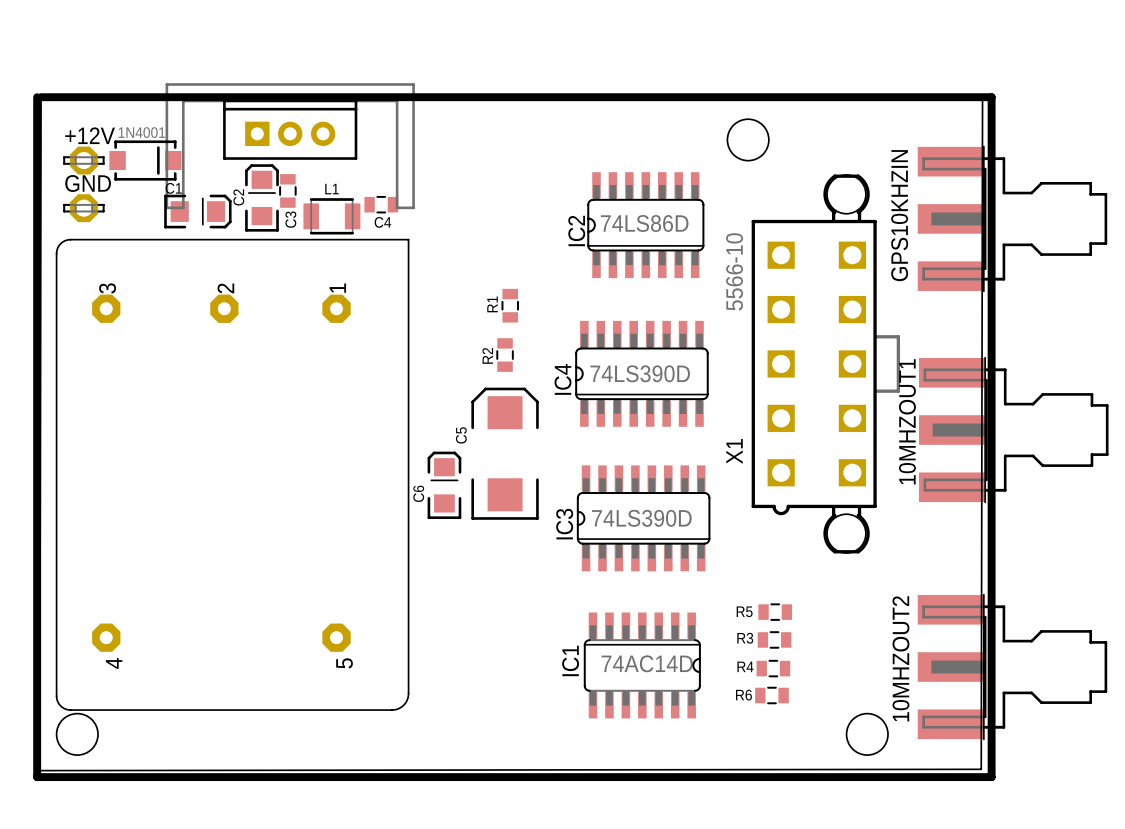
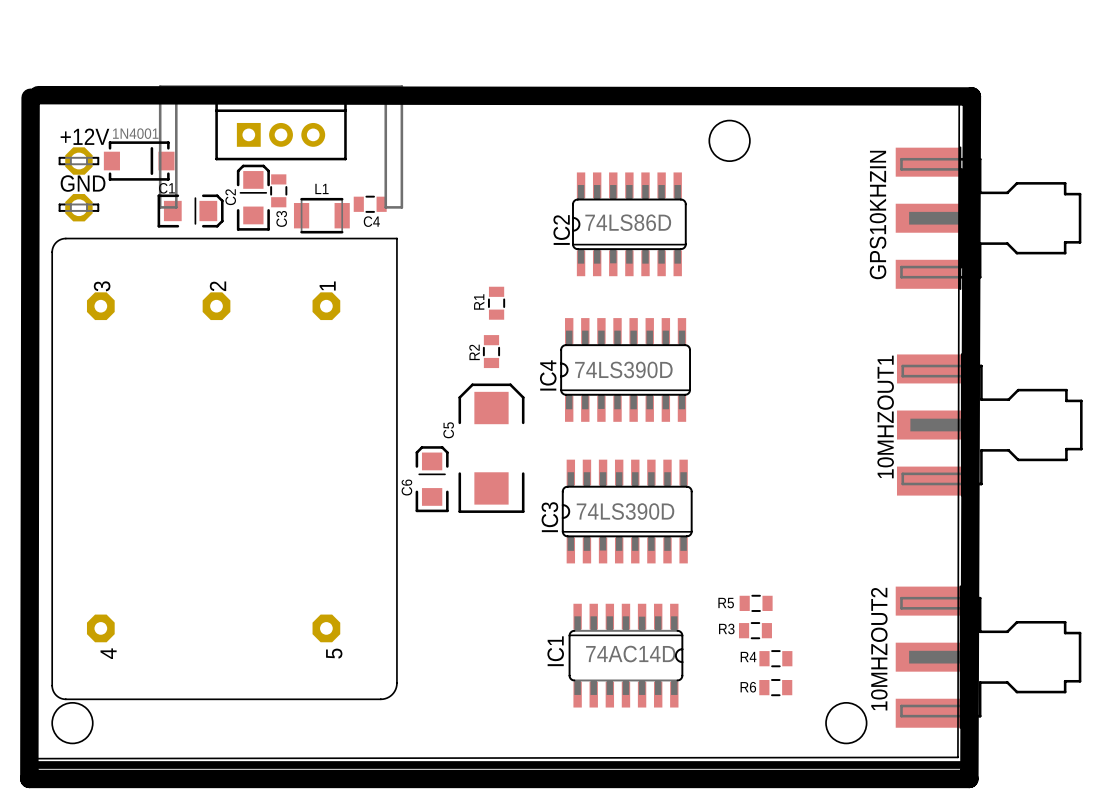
board edge: none -> (38, 95) (971, 96) (969, 778) (29, 778) (30, 97)
X1: 5566-10 (825, 363) -> none
R4 position: (773, 668) -> (775, 658)
R6 position: (771, 695) -> (775, 687)

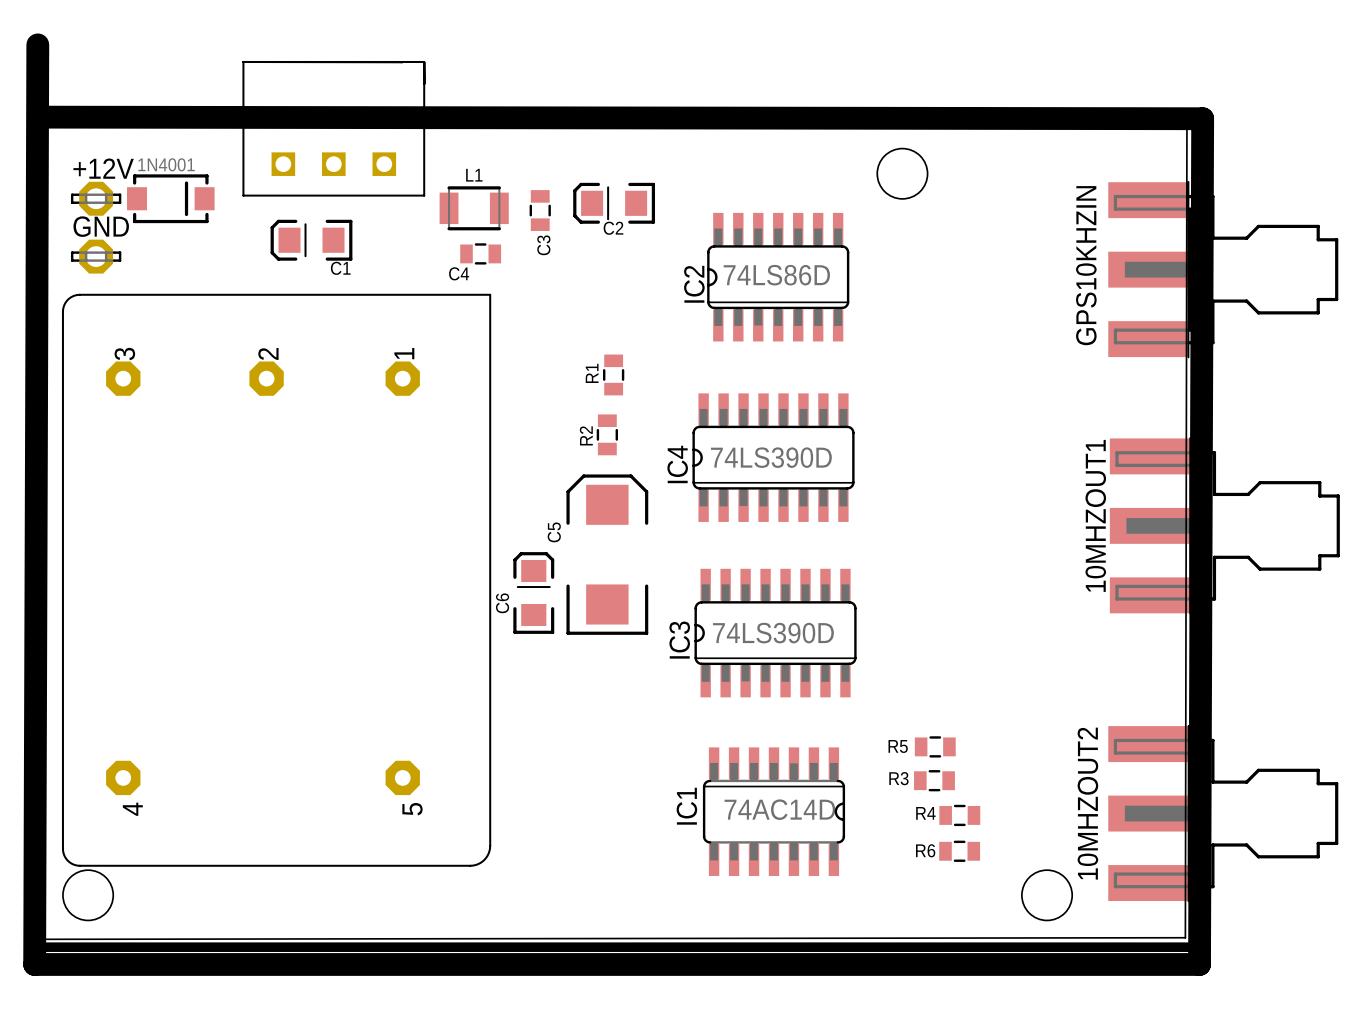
board edge: (30, 97) (29, 778) -> (37, 44) (34, 964)
part: none -> (333, 128)
part: (281, 146) -> none
C3 position: (278, 190) -> (540, 210)
C2 rotation: 0° (253, 197) -> 90° counterclockwise (614, 203)
C2 position: (253, 197) -> (614, 203)
C4 position: (370, 204) -> (480, 253)
C1 rotation: 0° (190, 211) -> 180° (311, 240)
C1 position: (190, 211) -> (311, 240)
L1 position: (321, 215) -> (474, 208)

